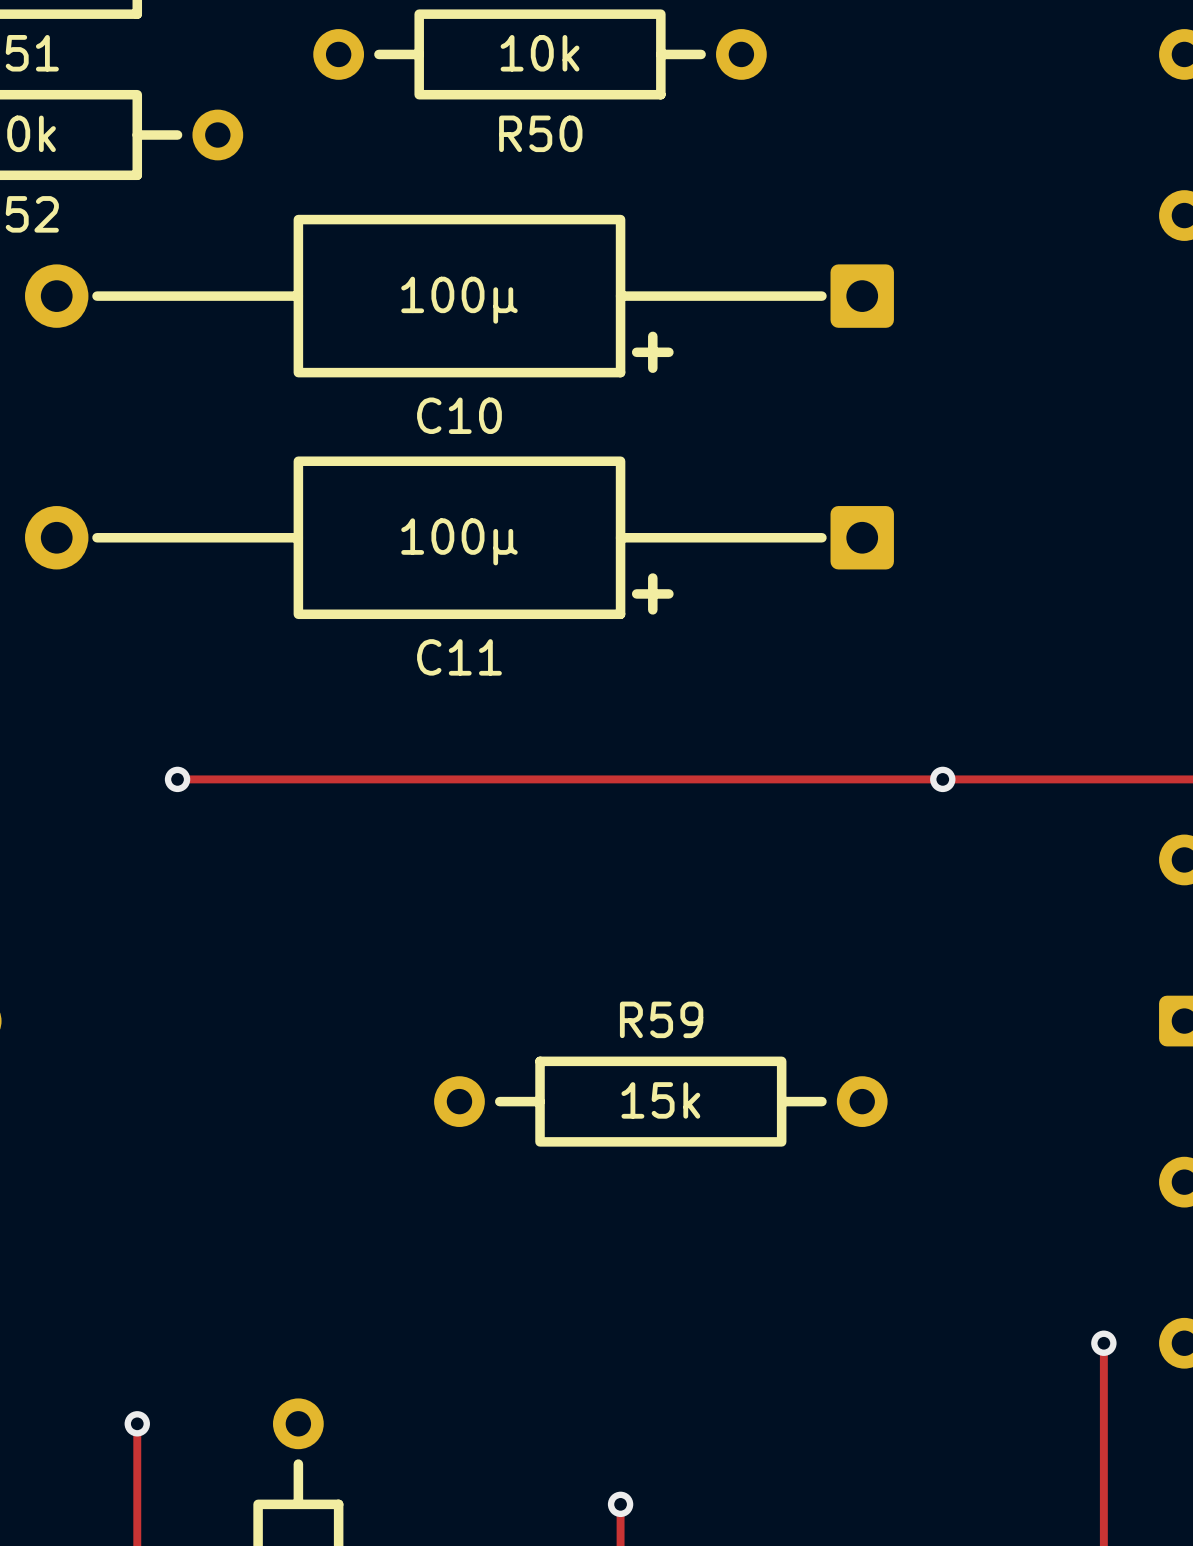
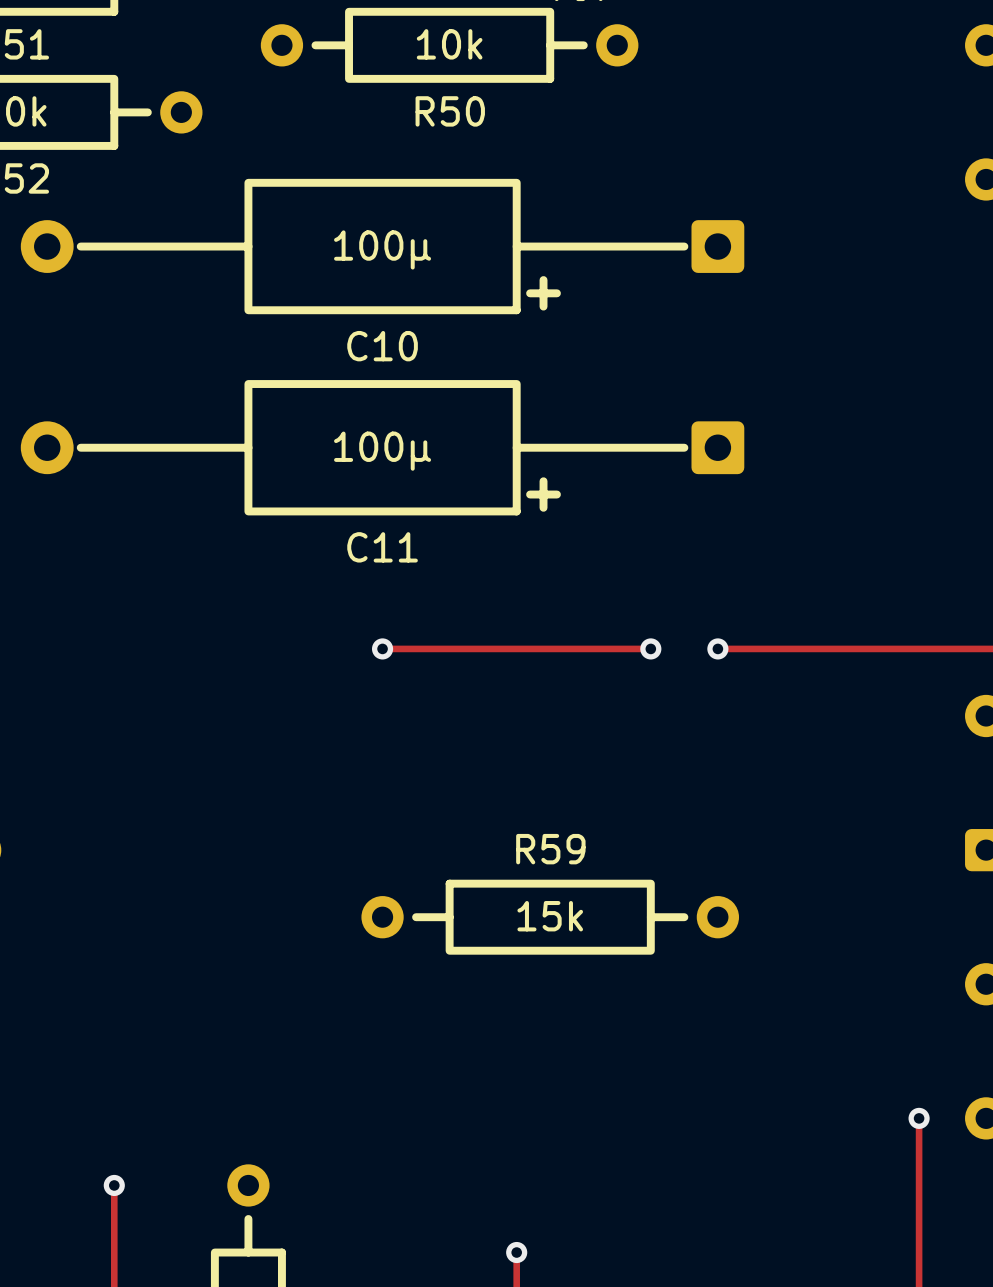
track: (177, 779) (459, 779) -> none
via: (177, 779) -> none
via: none -> (382, 648)
track: (781, 779) (862, 779) -> none
via: none -> (650, 648)
via: none -> (717, 648)
via: (942, 779) -> none

